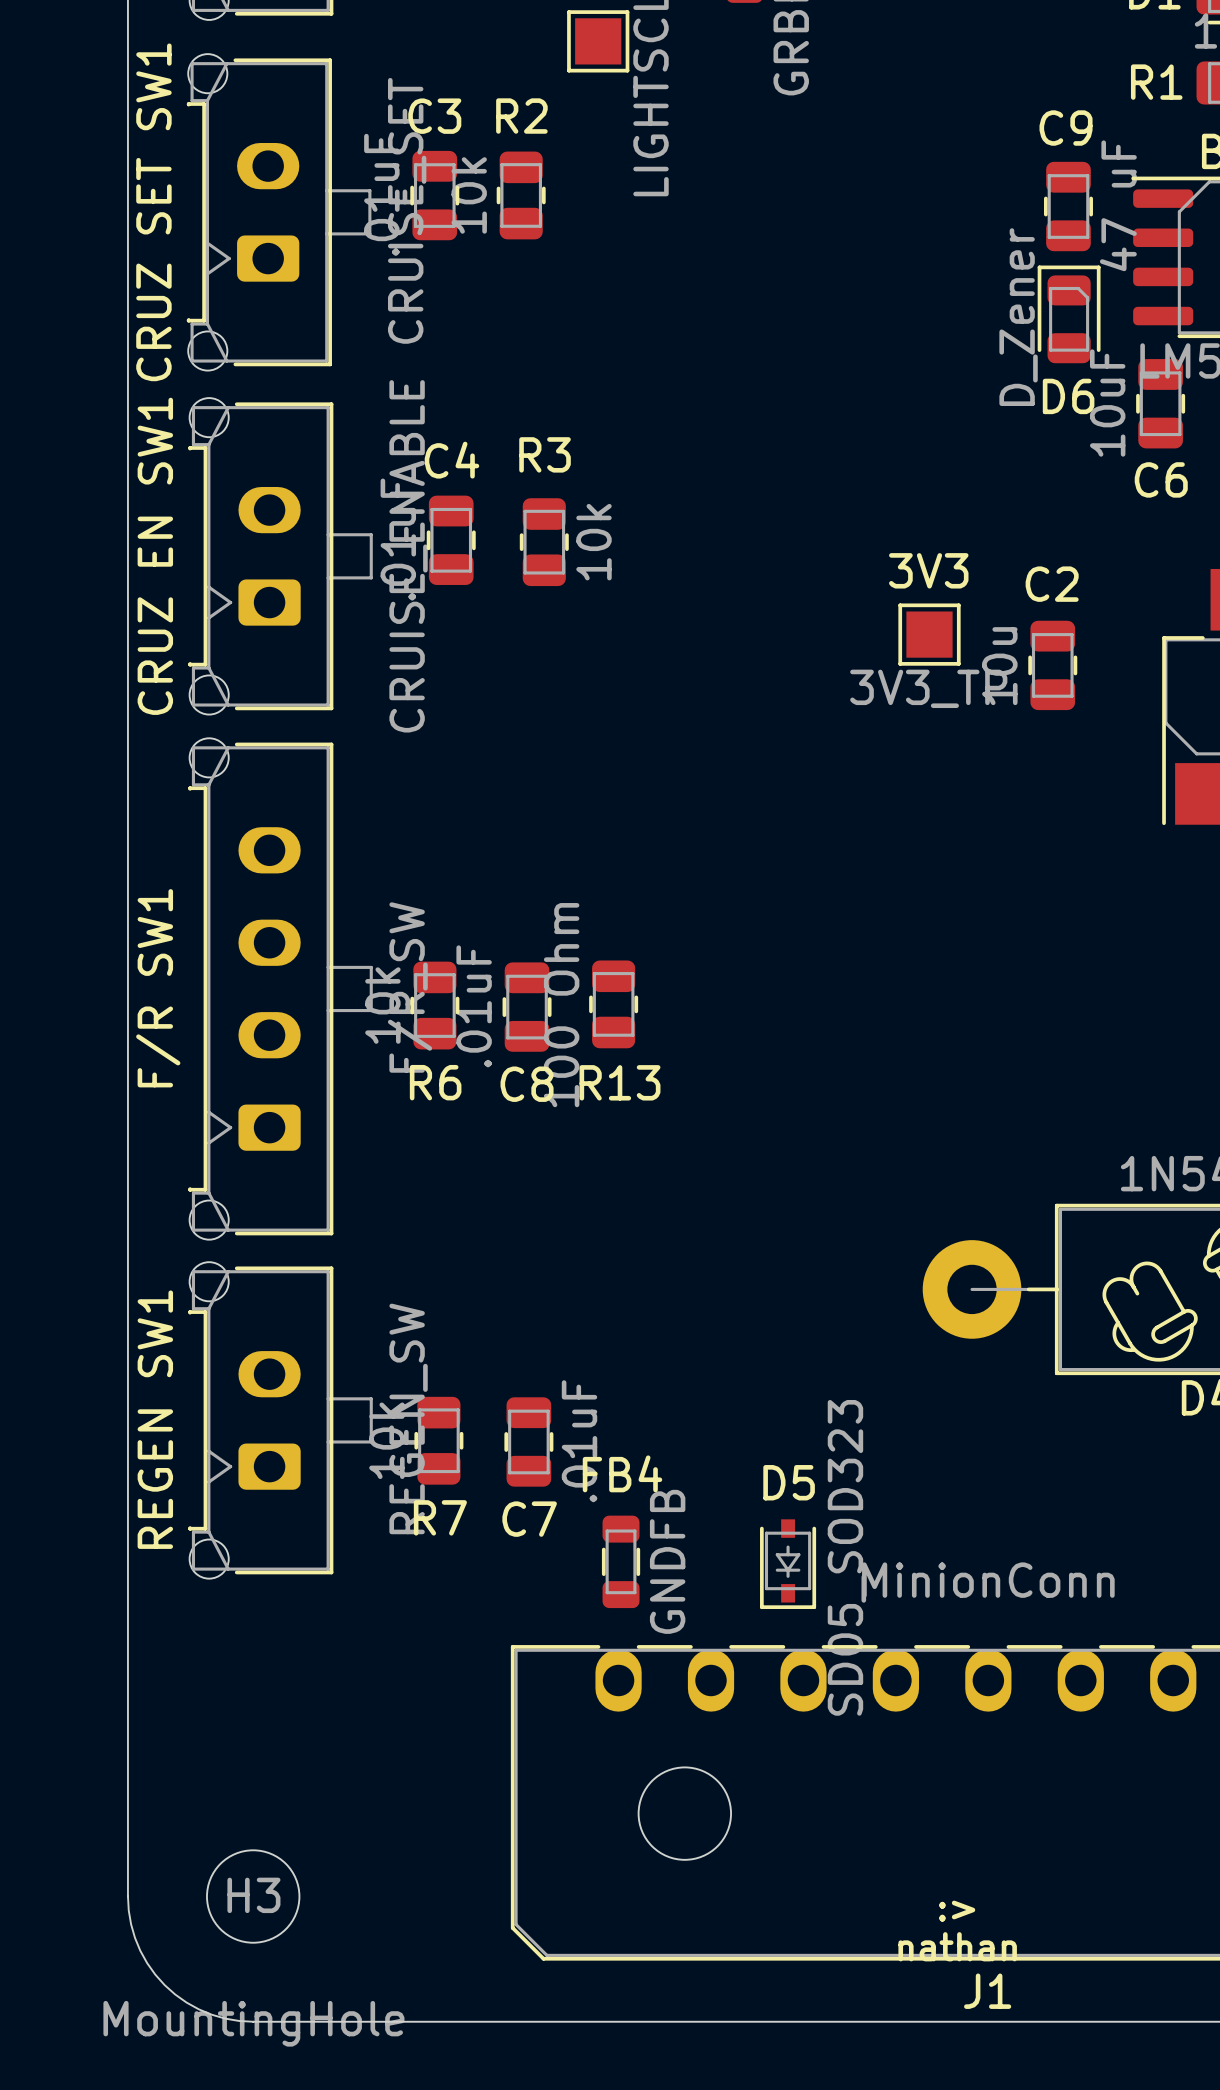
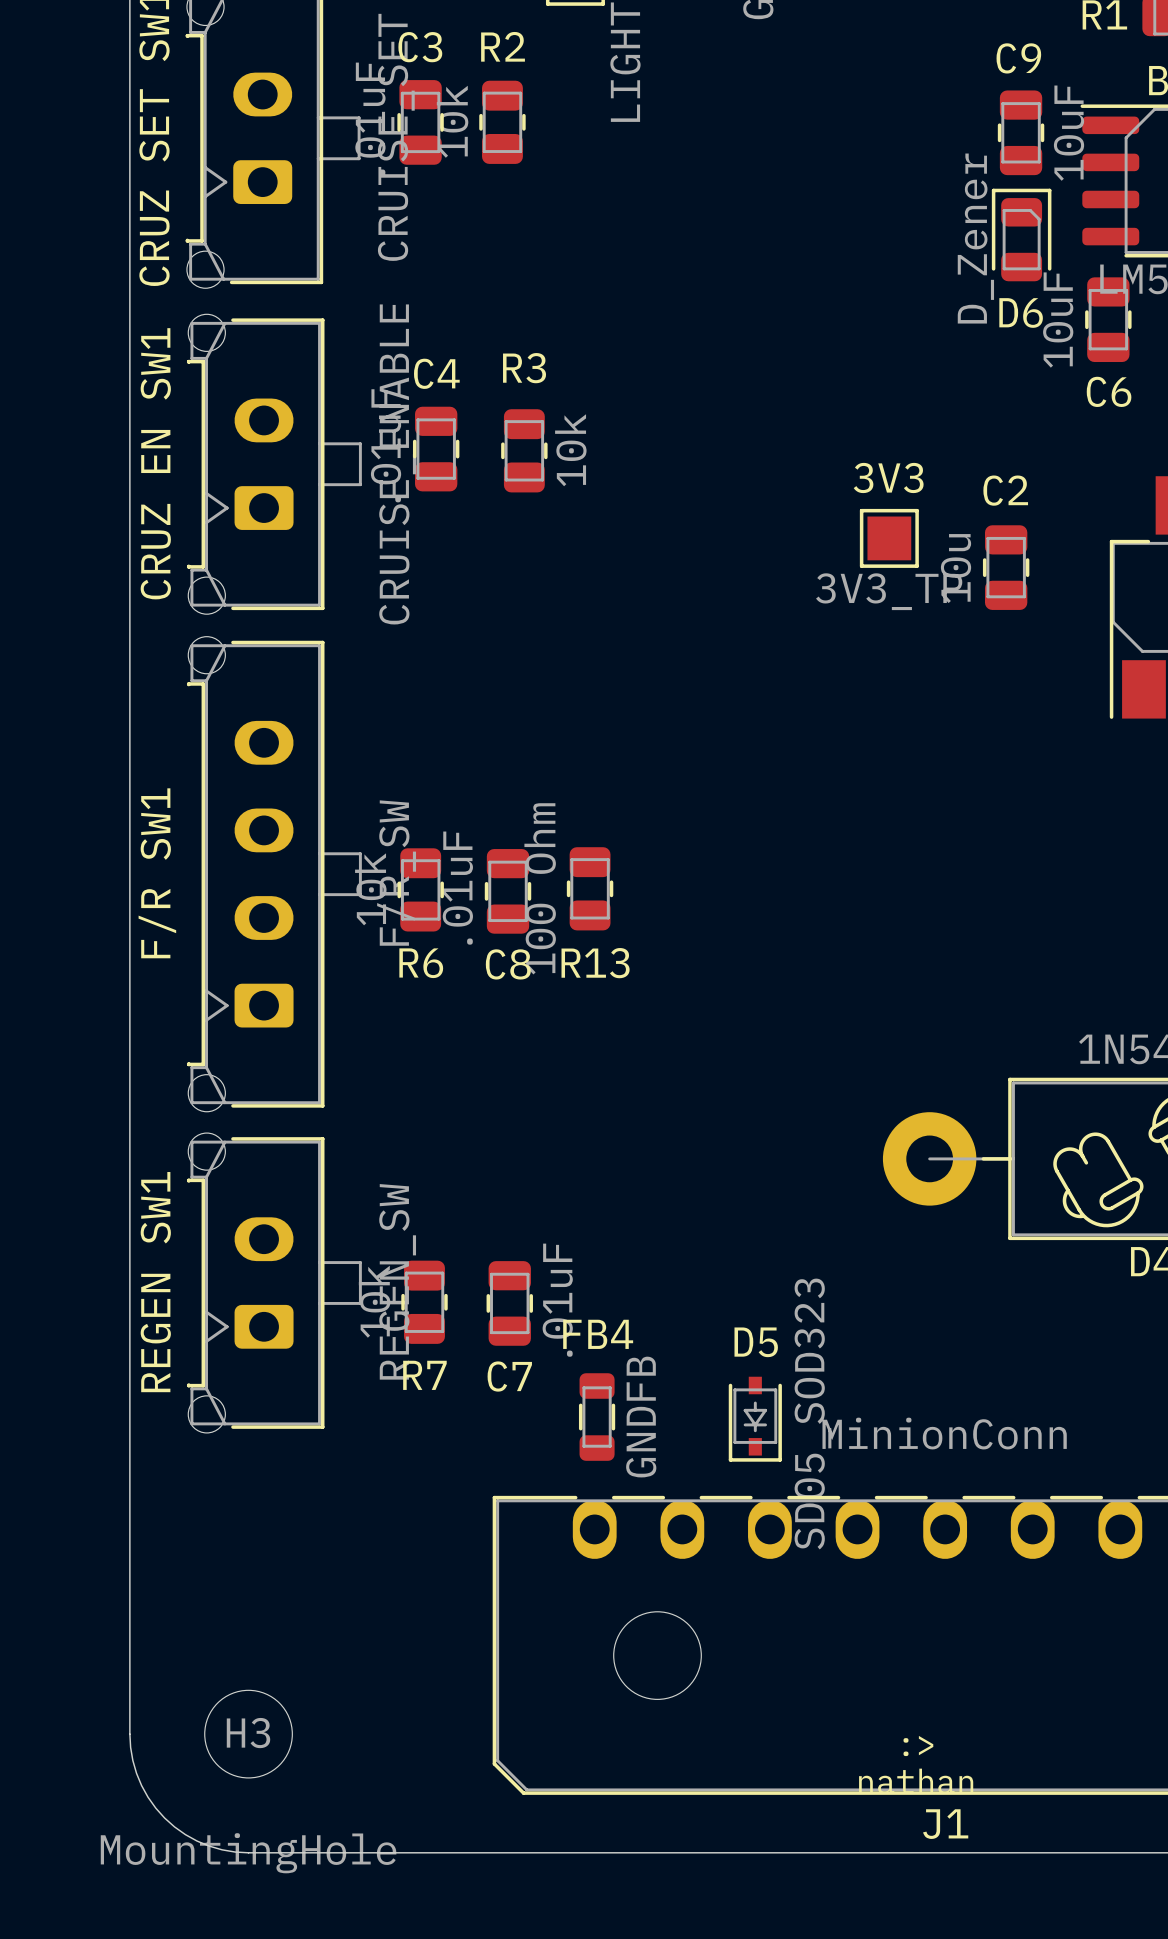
C9 value: 47 uF (1118, 205) -> 10uF (1069, 133)

